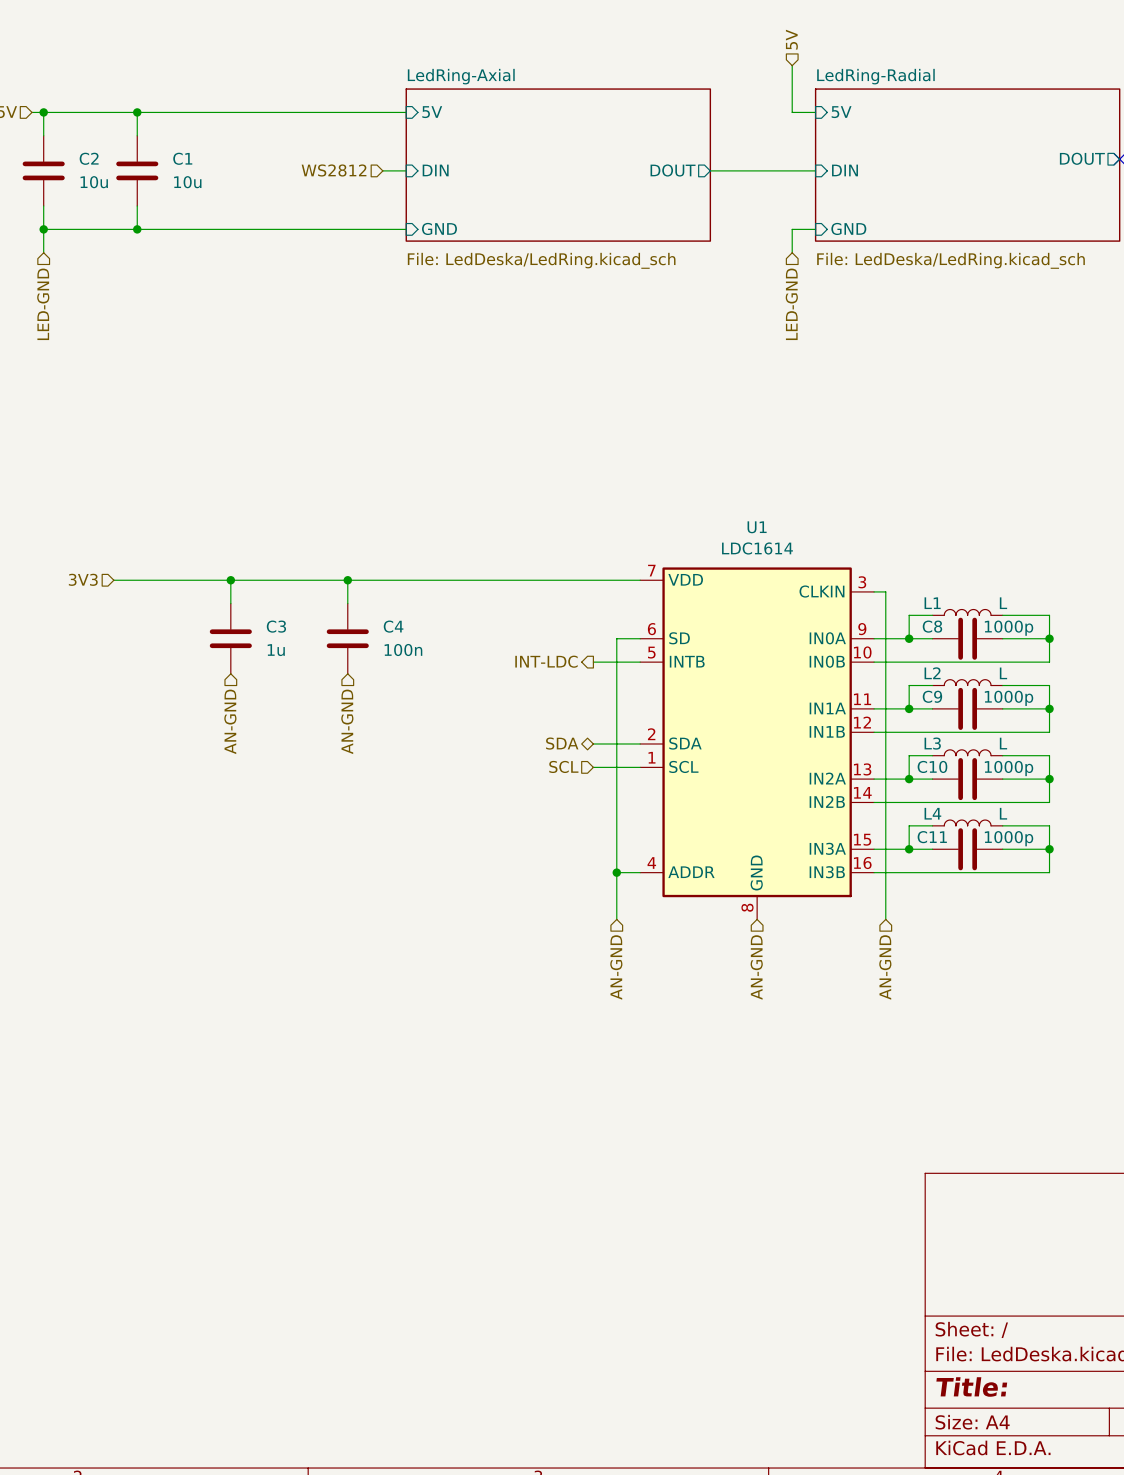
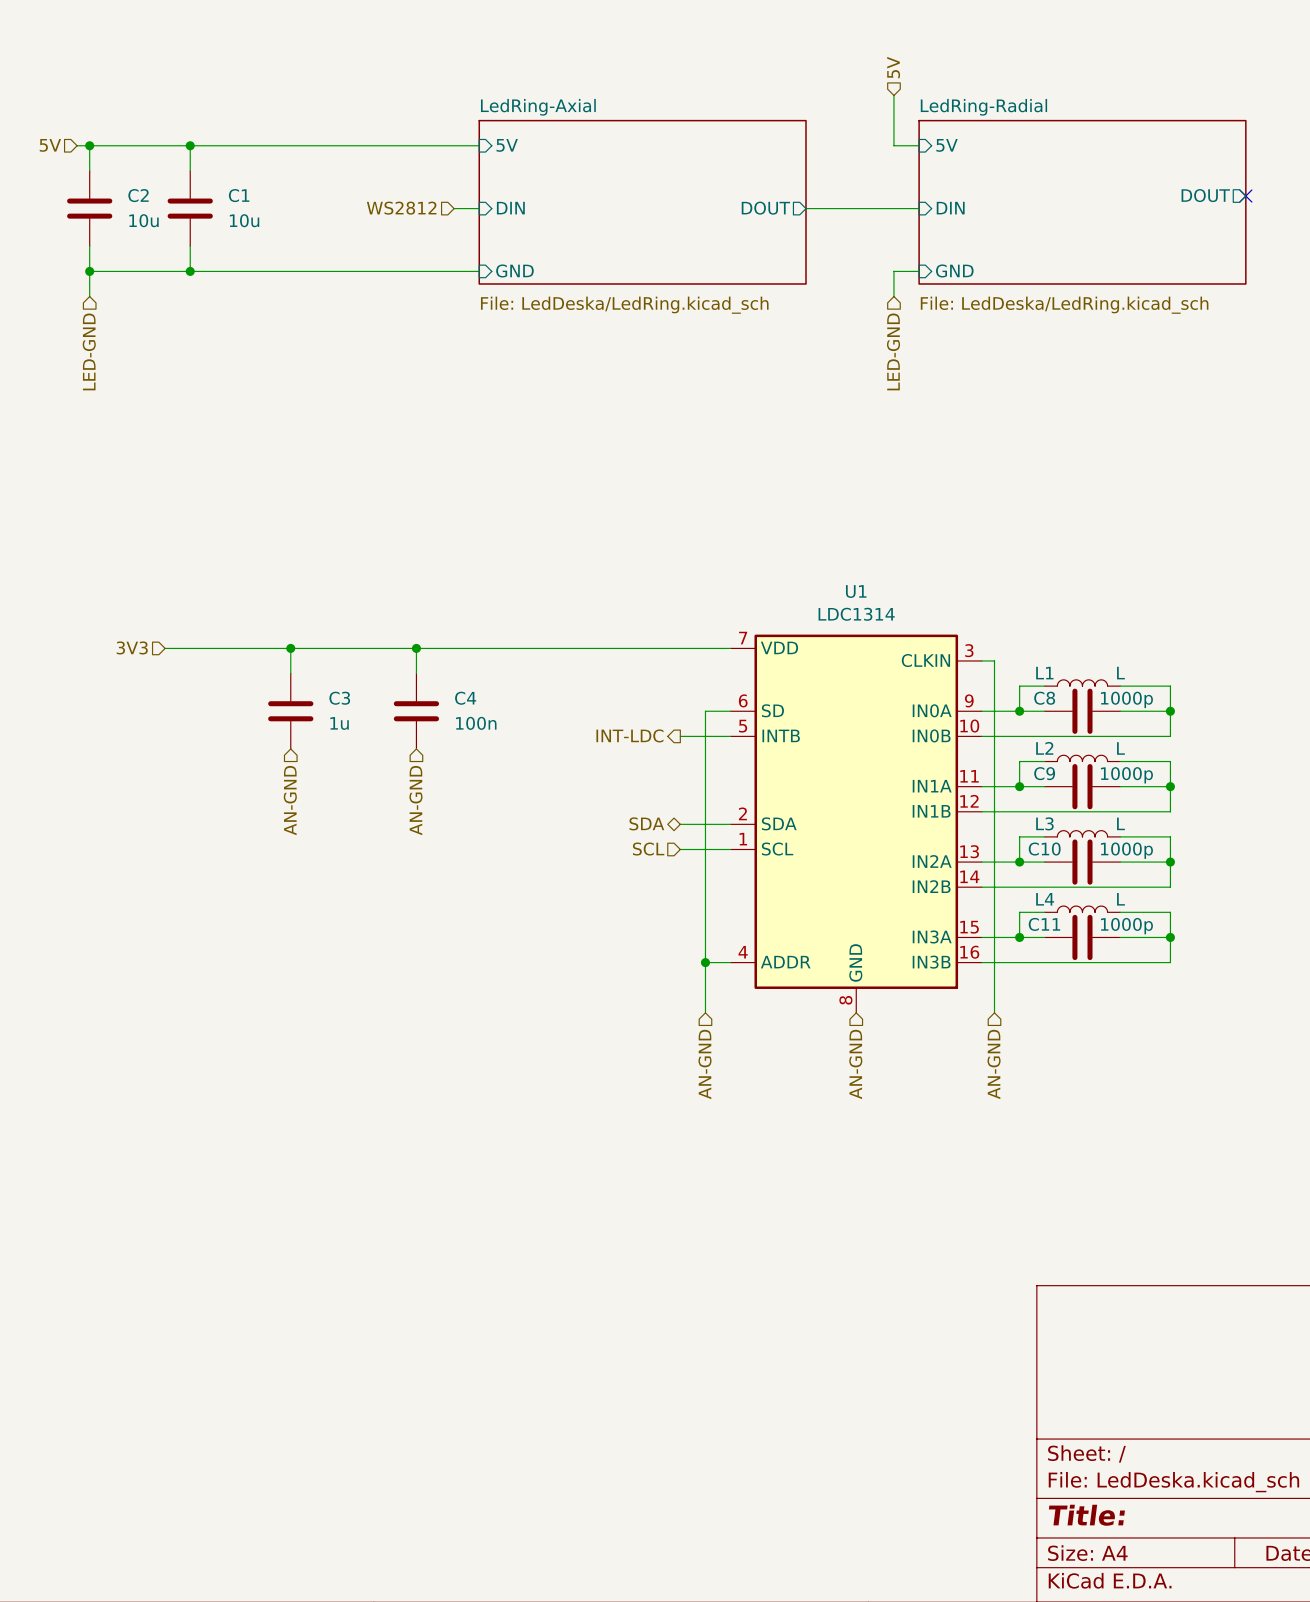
U1 value: LDC1614 (757, 548) -> LDC1314 (856, 614)

